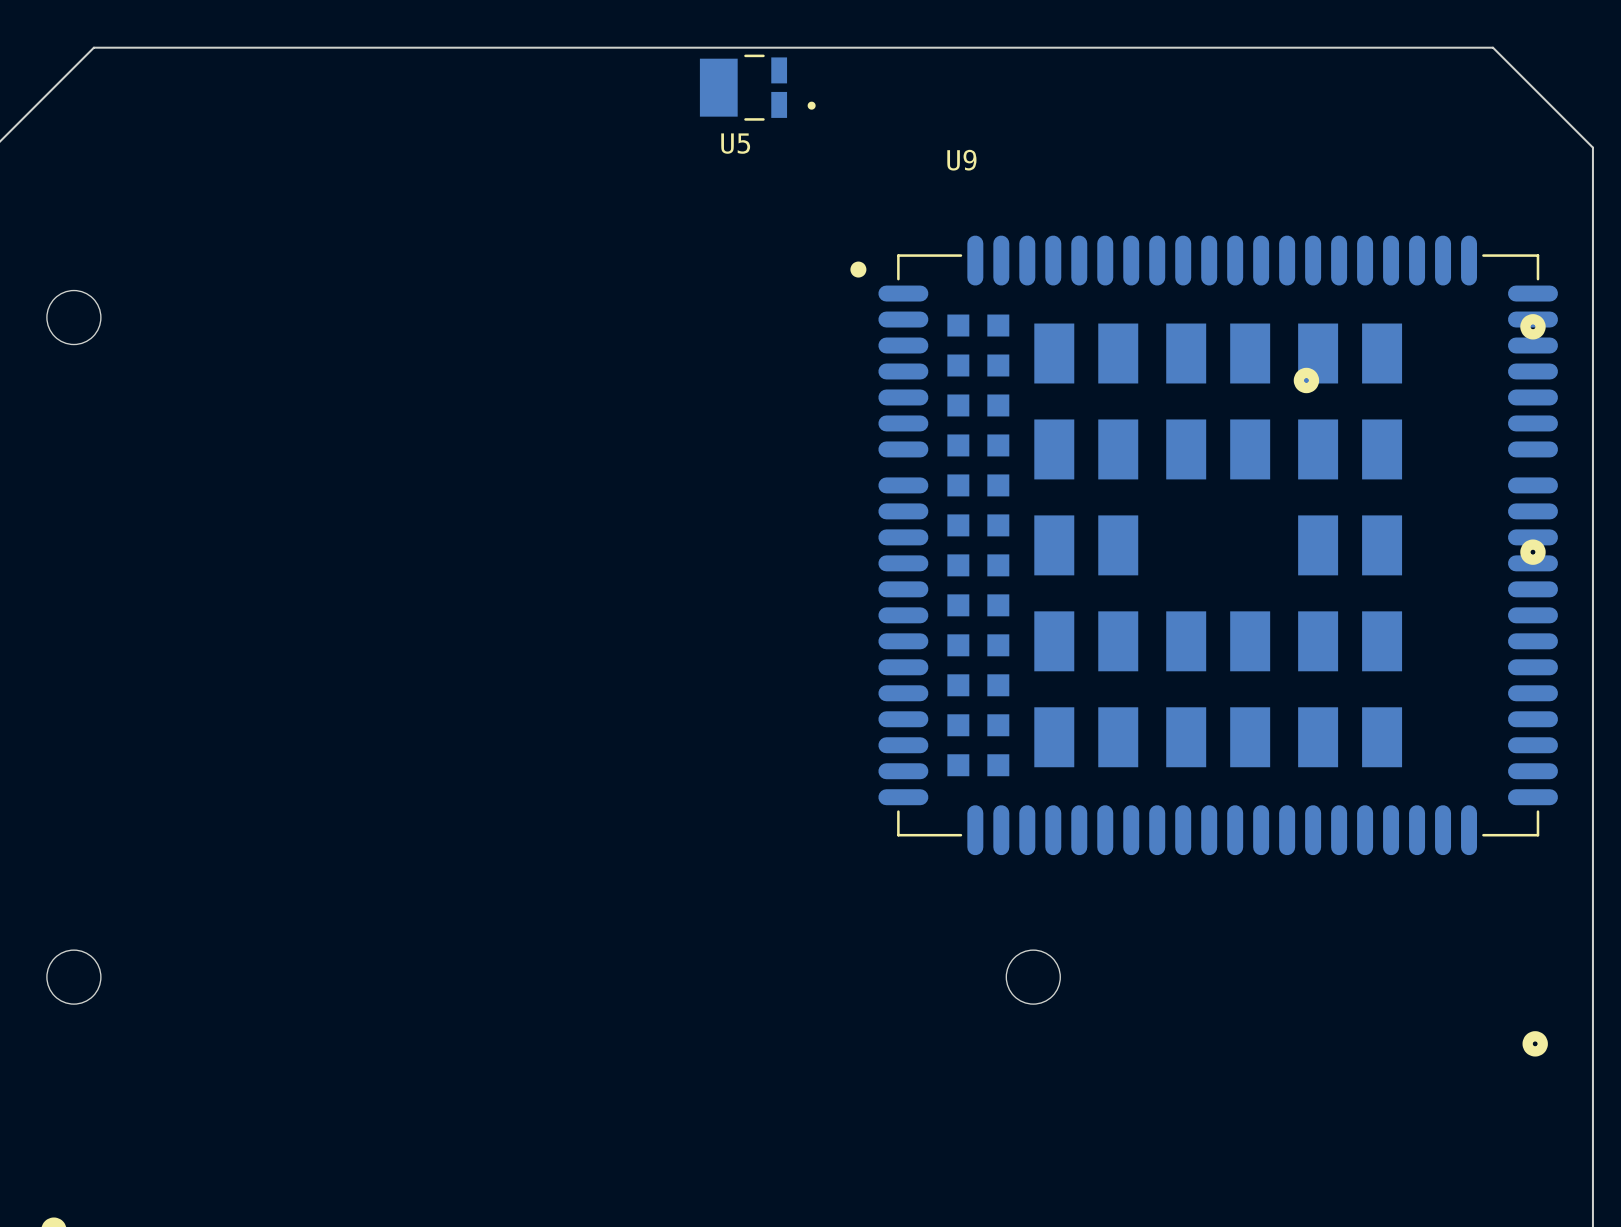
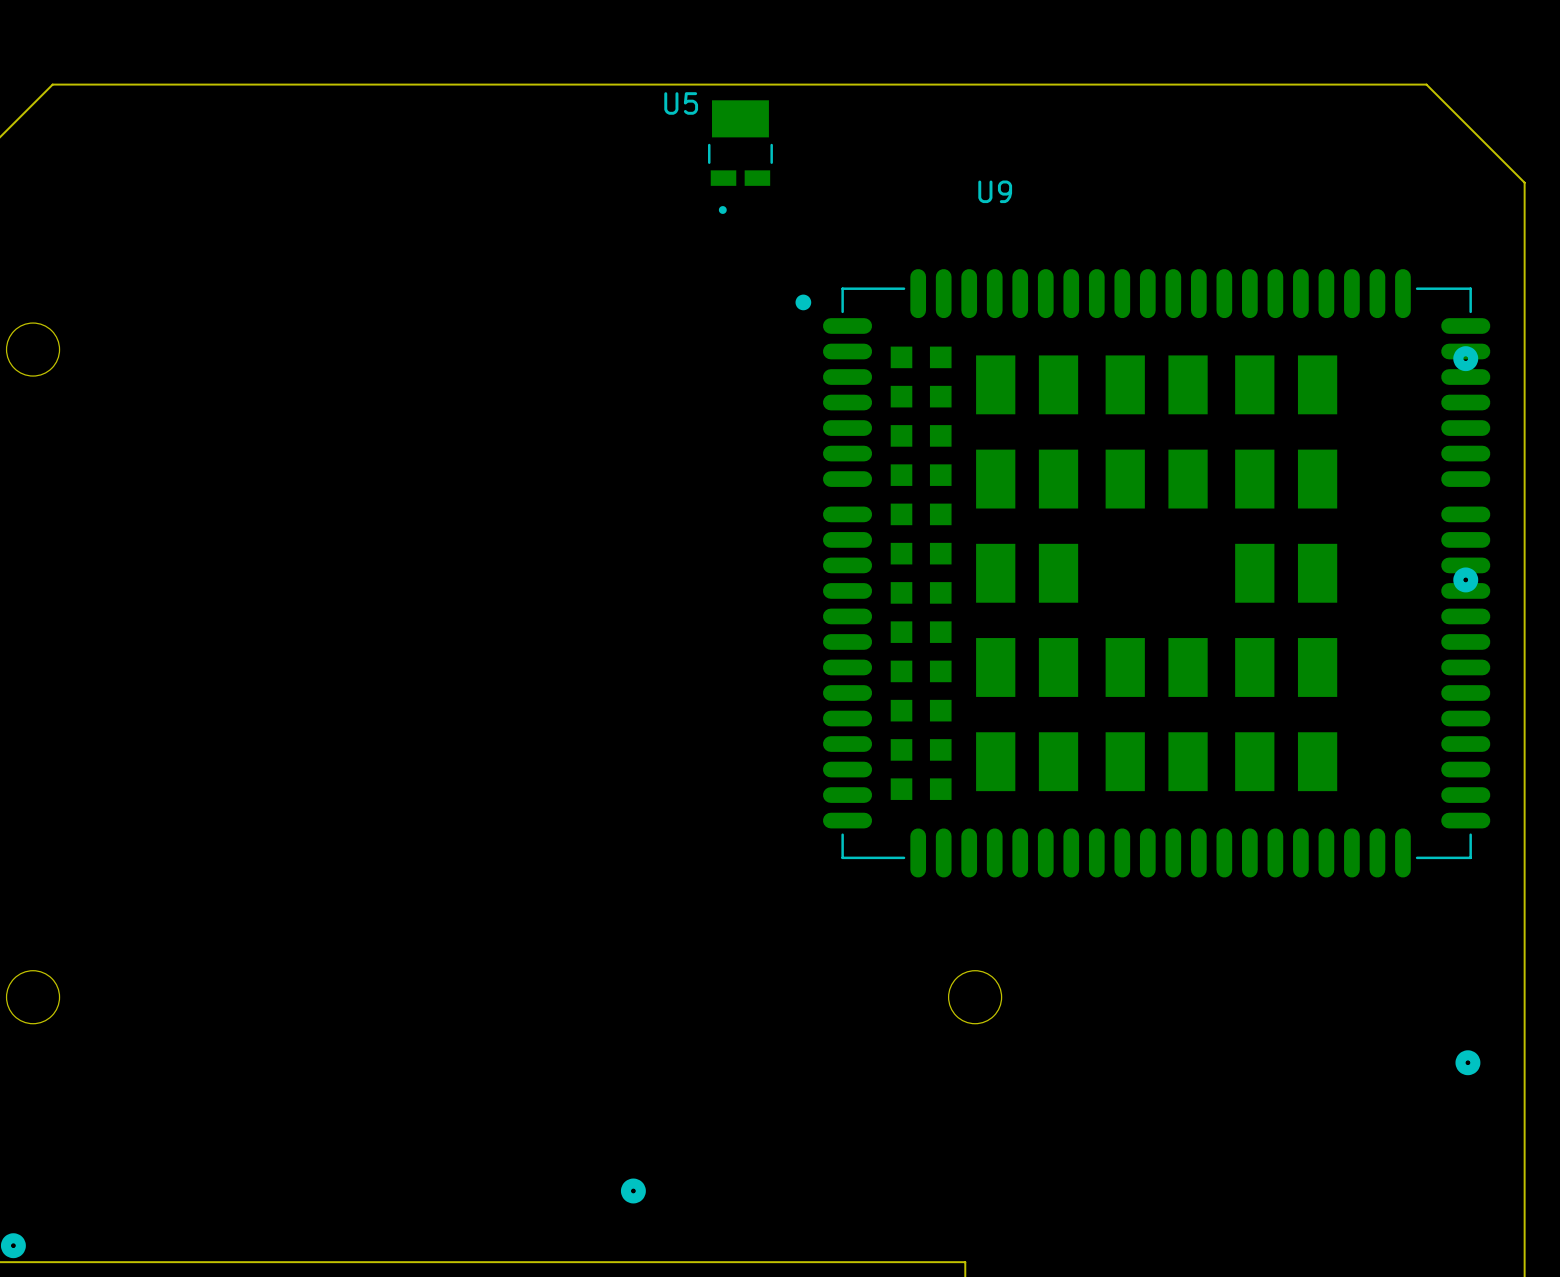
U5 rotation: 0° (757, 87) -> 90° clockwise (740, 157)
U9 name position: U9 (961, 160) -> U9 (995, 191)
part: (1306, 380) -> none
part: none -> (633, 1190)

